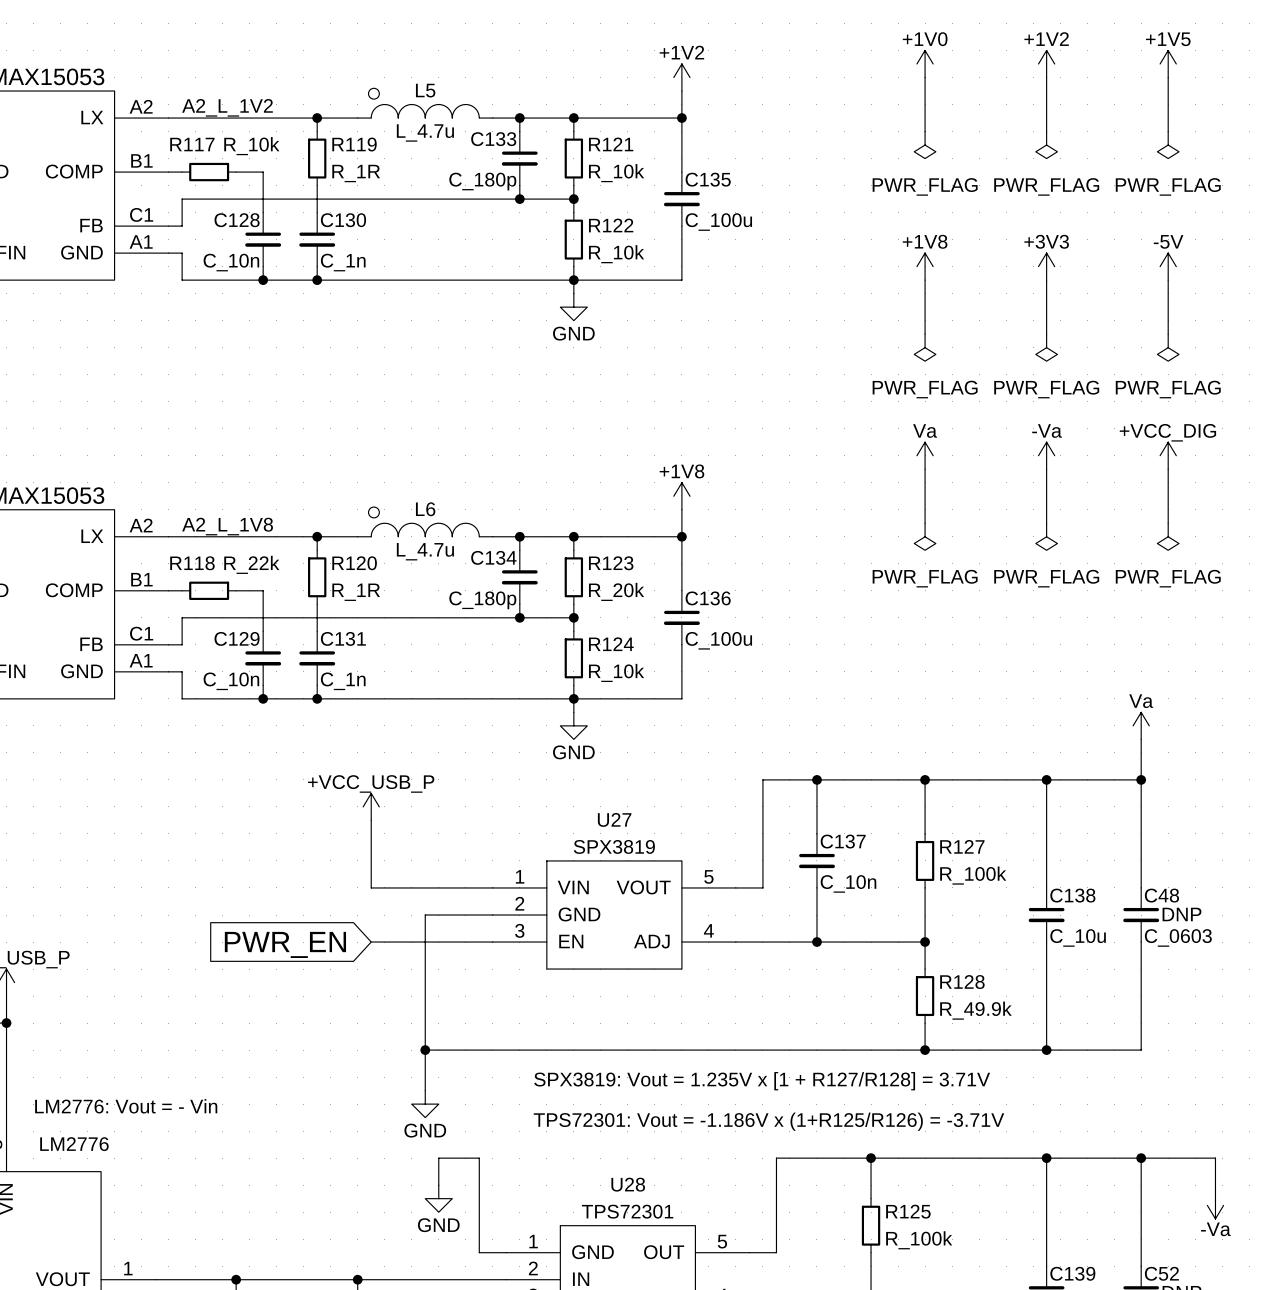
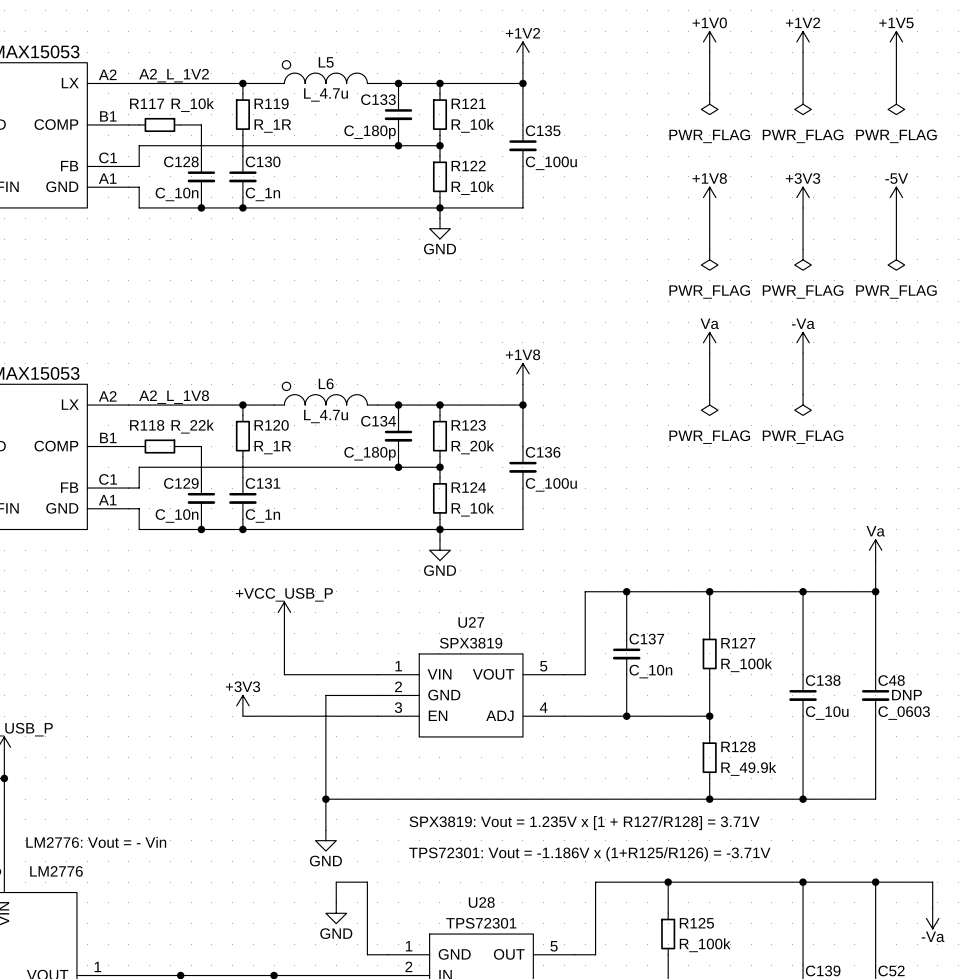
power symbol: +VCC_DIG (1168, 455) -> none
wire: (1168, 469) (1168, 523) -> none
power symbol: PWR_FLAG (1168, 536) -> none
power symbol: none -> +3V3 (242, 705)
wire: none -> (242, 716) (284, 716)
global label: PWR_EN (285, 944) -> none

